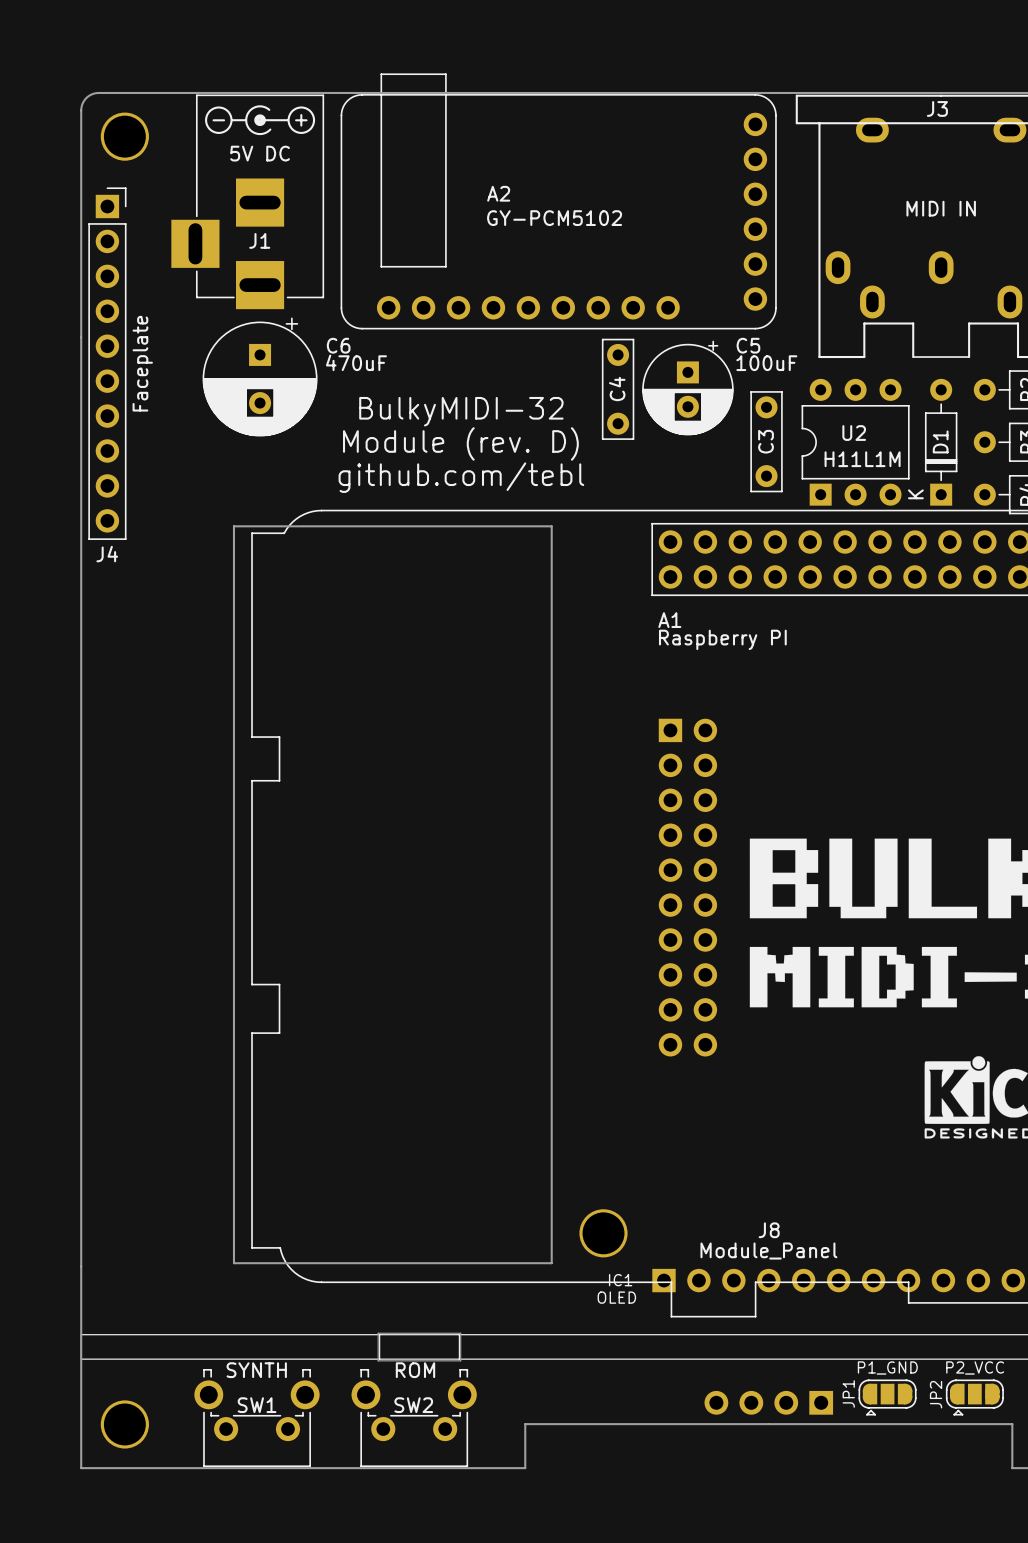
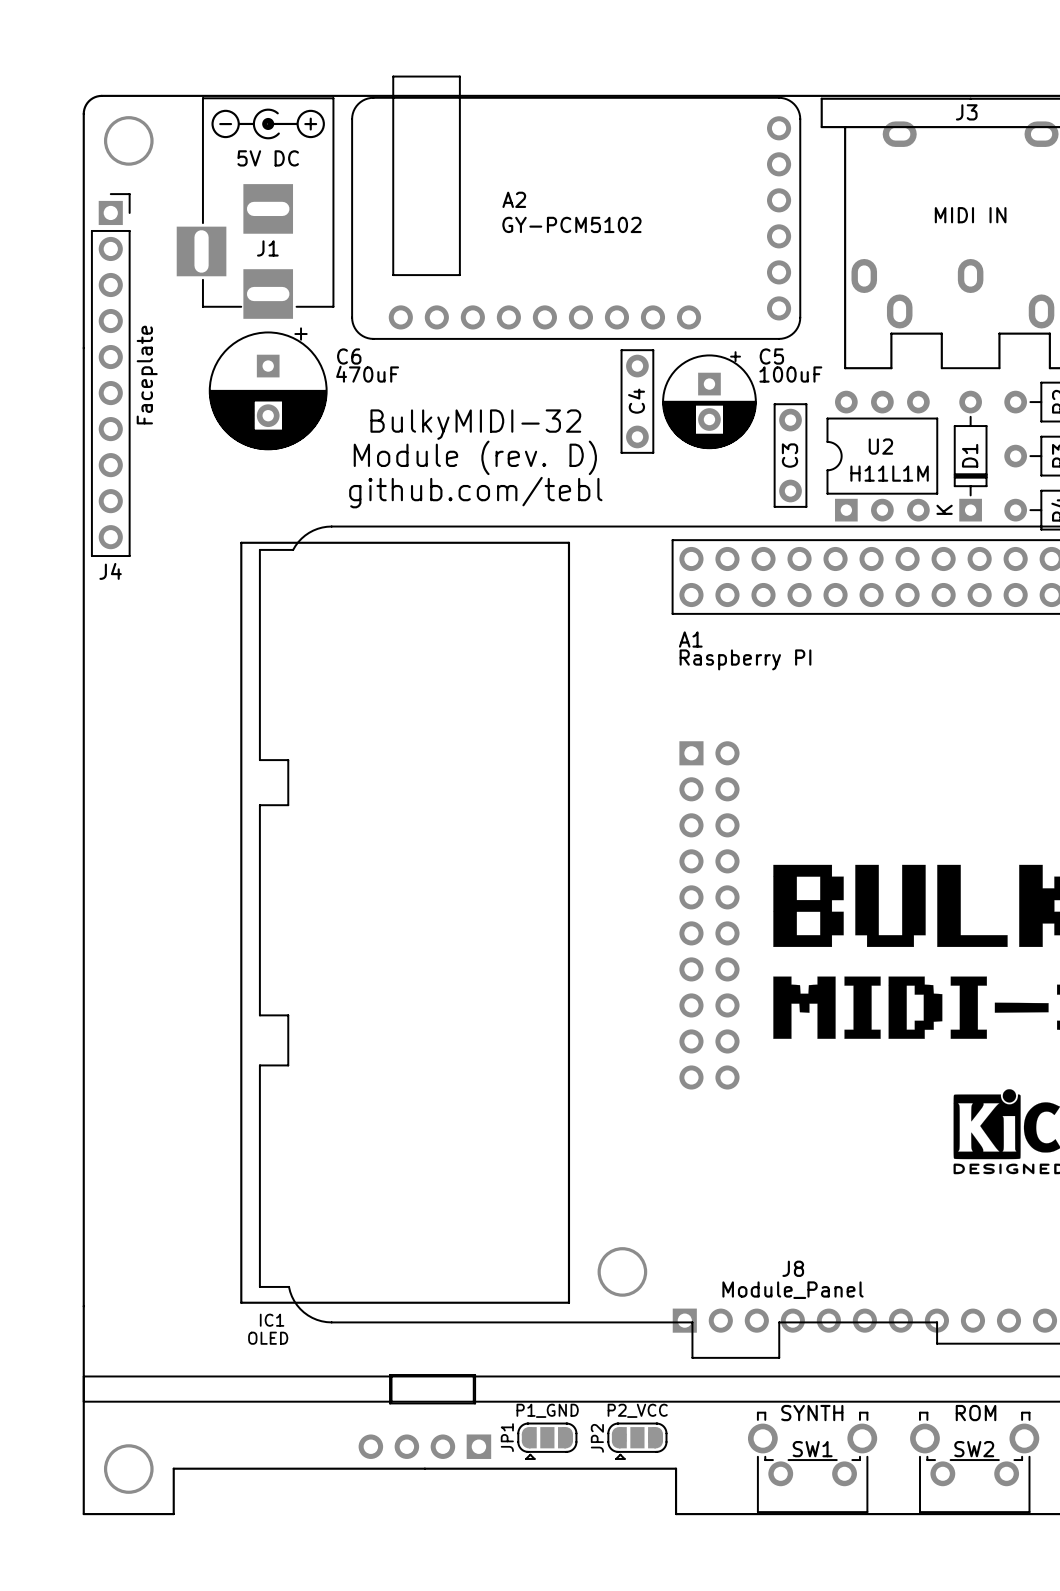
JP1 position: (887, 1397) -> (547, 1441)
JP2 position: (974, 1397) -> (637, 1441)
IC1 position: (768, 1402) -> (424, 1446)
SW1 position: (256, 1418) -> (812, 1462)
SW2 position: (414, 1418) -> (974, 1462)
board edge: (525, 1424) (525, 1468) (168, 1468) -> (541, 1468) (173, 1468) (173, 1514)
board edge: (655, 1424) (1012, 1424) (1012, 1468) -> (676, 1468) (676, 1514) (1044, 1514)

